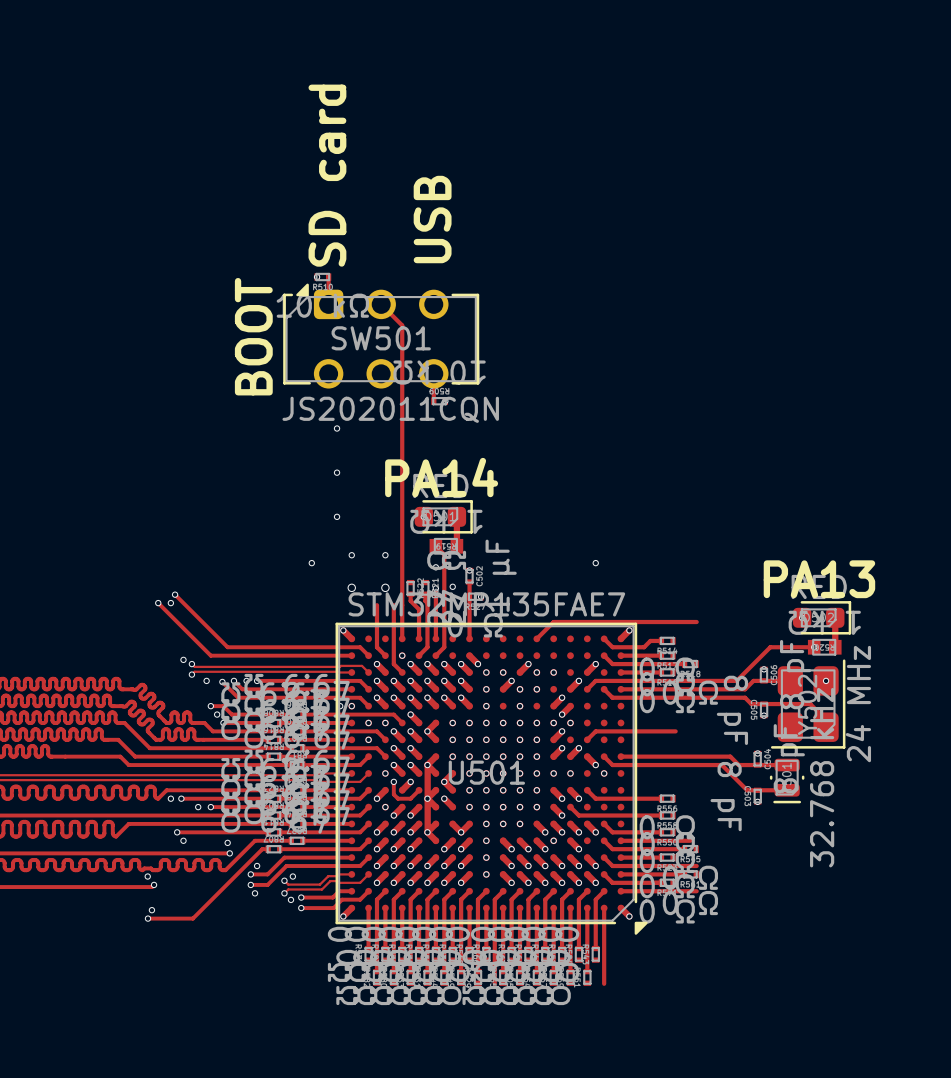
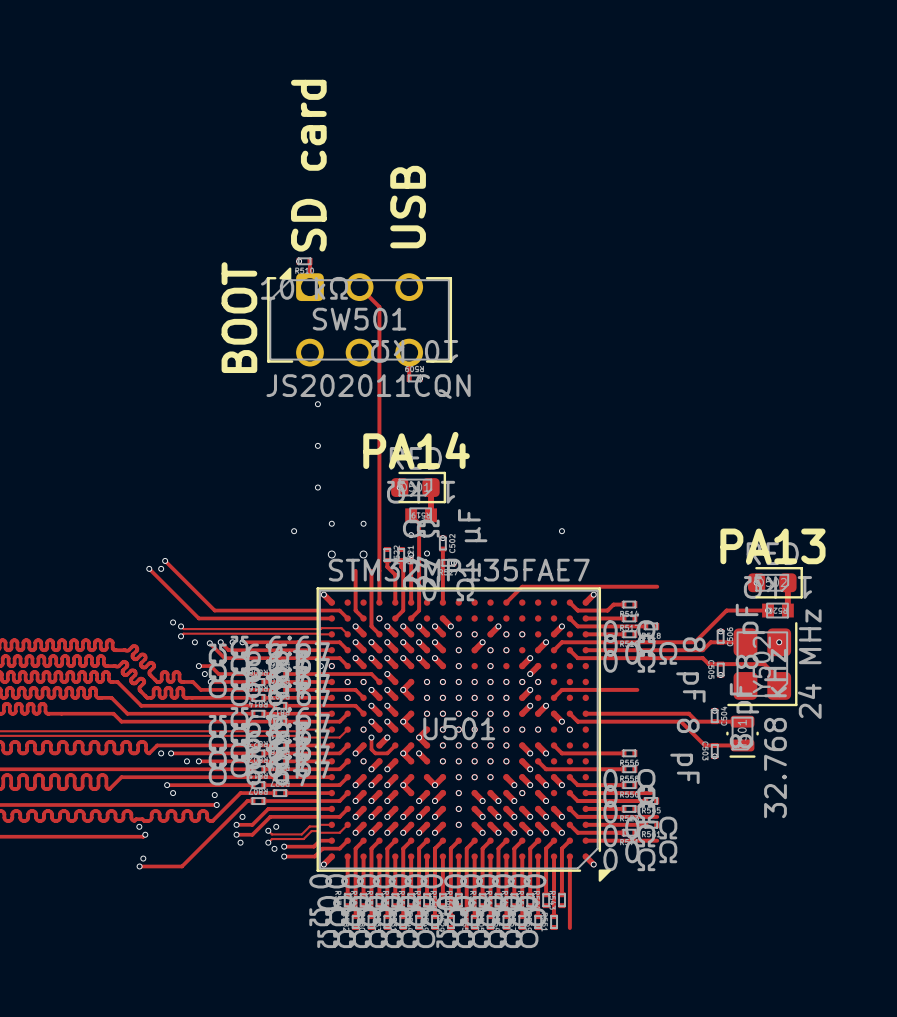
track: (427, 765) (427, 798) -> none
track: (427, 798) (427, 832) -> none

